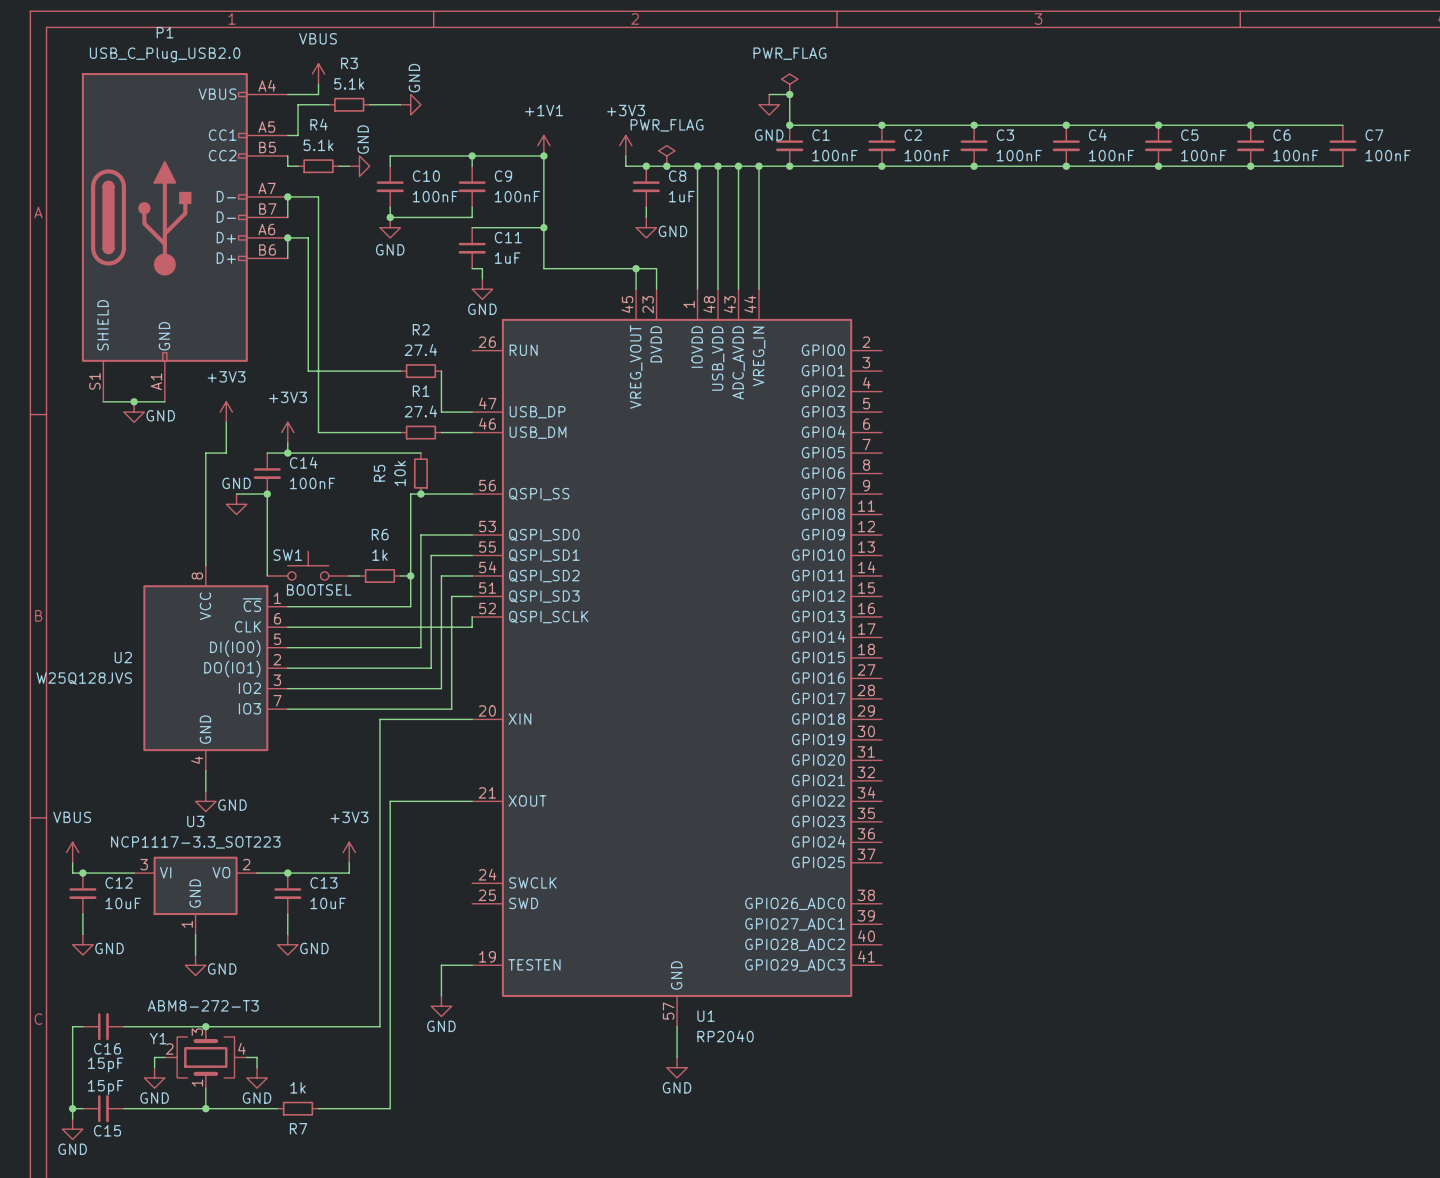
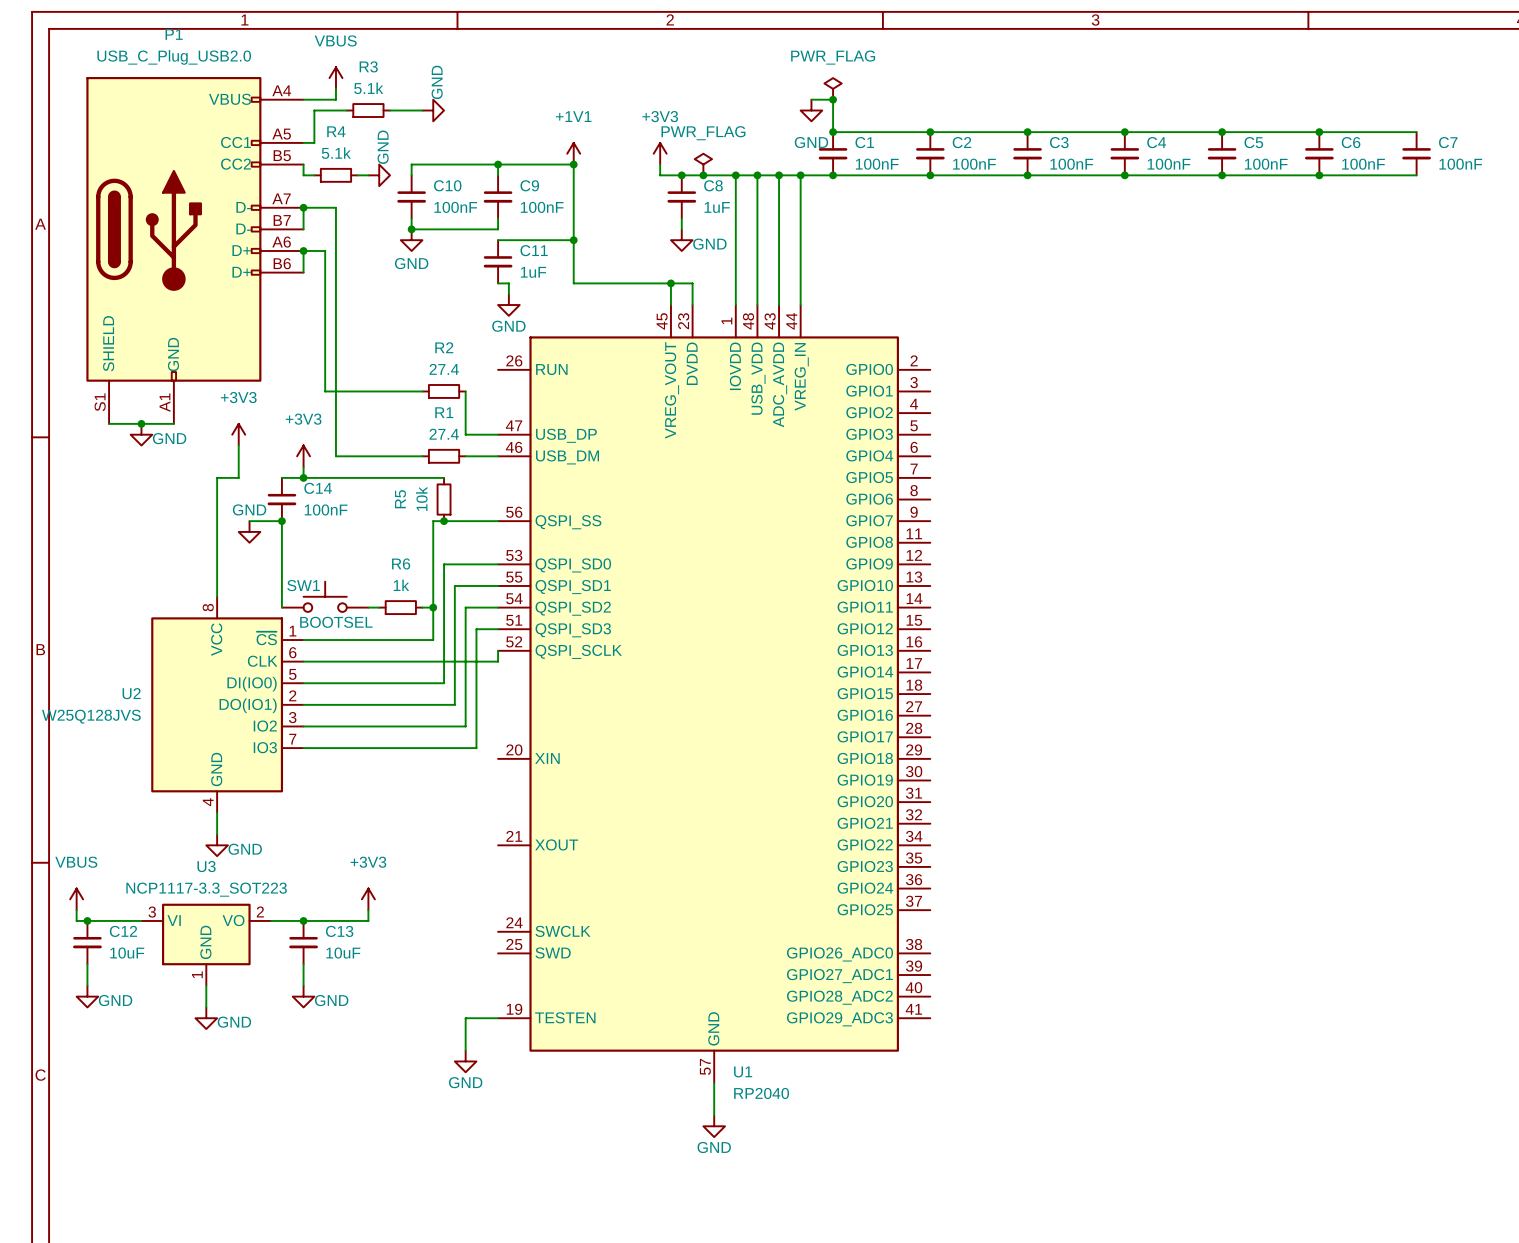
wire: (472, 719) (379, 719) (379, 1026) (123, 1026) -> none
wire: (472, 801) (390, 801) (390, 1108) (318, 1108) -> none
wire: (82, 1026) (72, 1026) (72, 1118) -> none
C16: 15pF (103, 1026) -> none
junction: (205, 1026) -> none
wire: (164, 1057) (154, 1057) (154, 1067) -> none
Y1: ABM8-272-T3 (205, 1057) -> none
wire: (246, 1057) (257, 1057) (257, 1067) -> none
power symbol: GND (154, 1077) -> none
power symbol: GND (257, 1077) -> none
wire: (205, 1088) (205, 1108) -> none
wire: (72, 1108) (82, 1108) -> none
junction: (72, 1108) -> none
C15: 15pF (103, 1108) -> none
wire: (123, 1108) (277, 1108) -> none
junction: (205, 1108) -> none
R7: 1k (298, 1108) -> none
power symbol: GND (72, 1129) -> none

